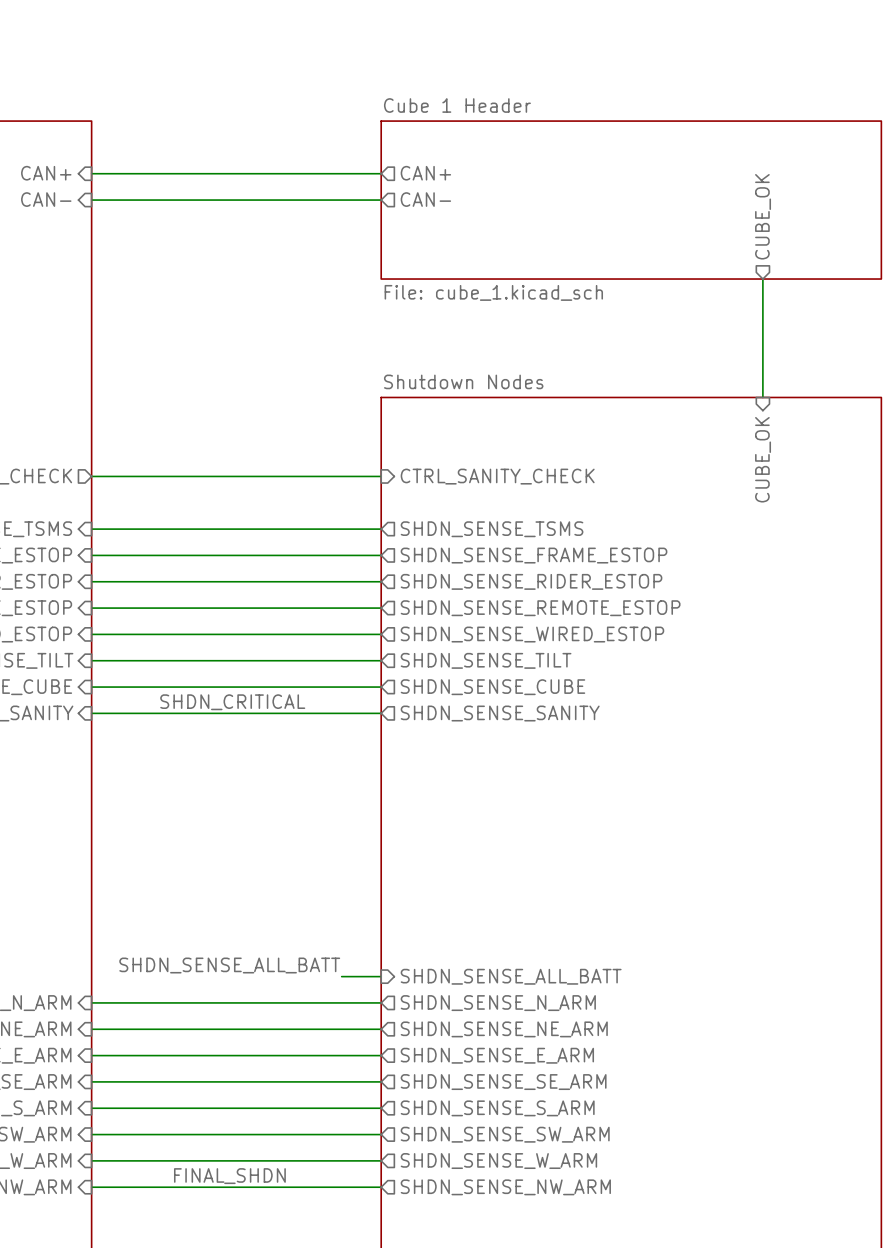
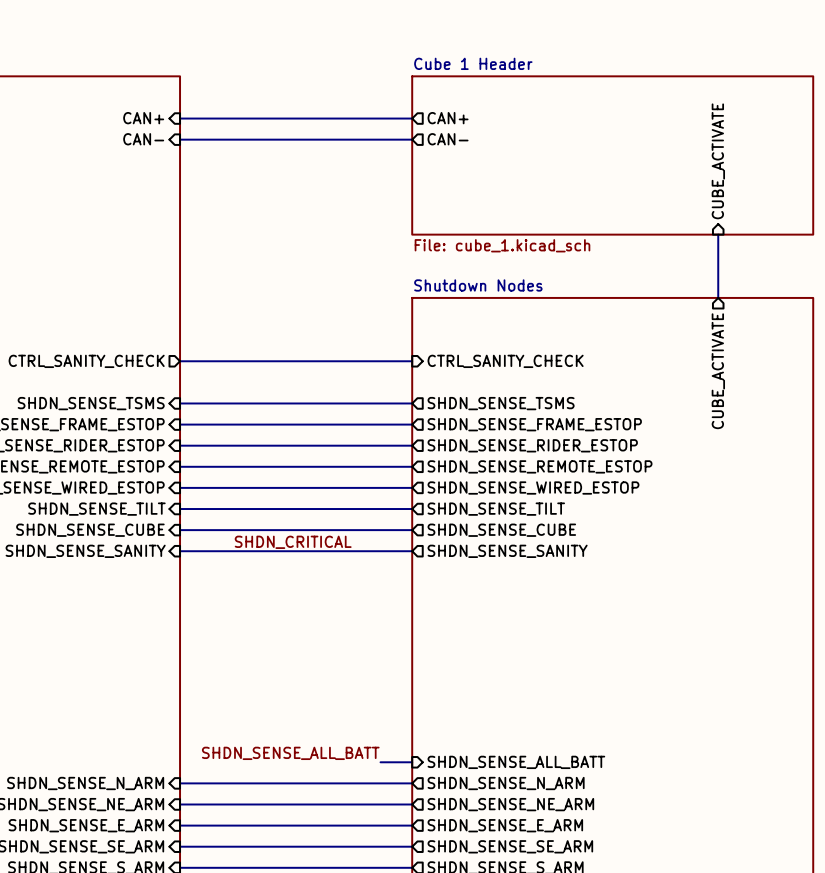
sheet Cube 1 Header shape: [380, 120, 883, 280] -> [411, 75, 814, 236]
sheet pin: CUBE_OK (763, 216) -> none
sheet pin: none -> CUBE_ACTIVATE (718, 161)
wire: (762, 279) (762, 318) -> none
sheet pin shape: input (763, 459) -> output (718, 371)
sheet pin: CUBE_OK (763, 459) -> CUBE_ACTIVATE (718, 371)

